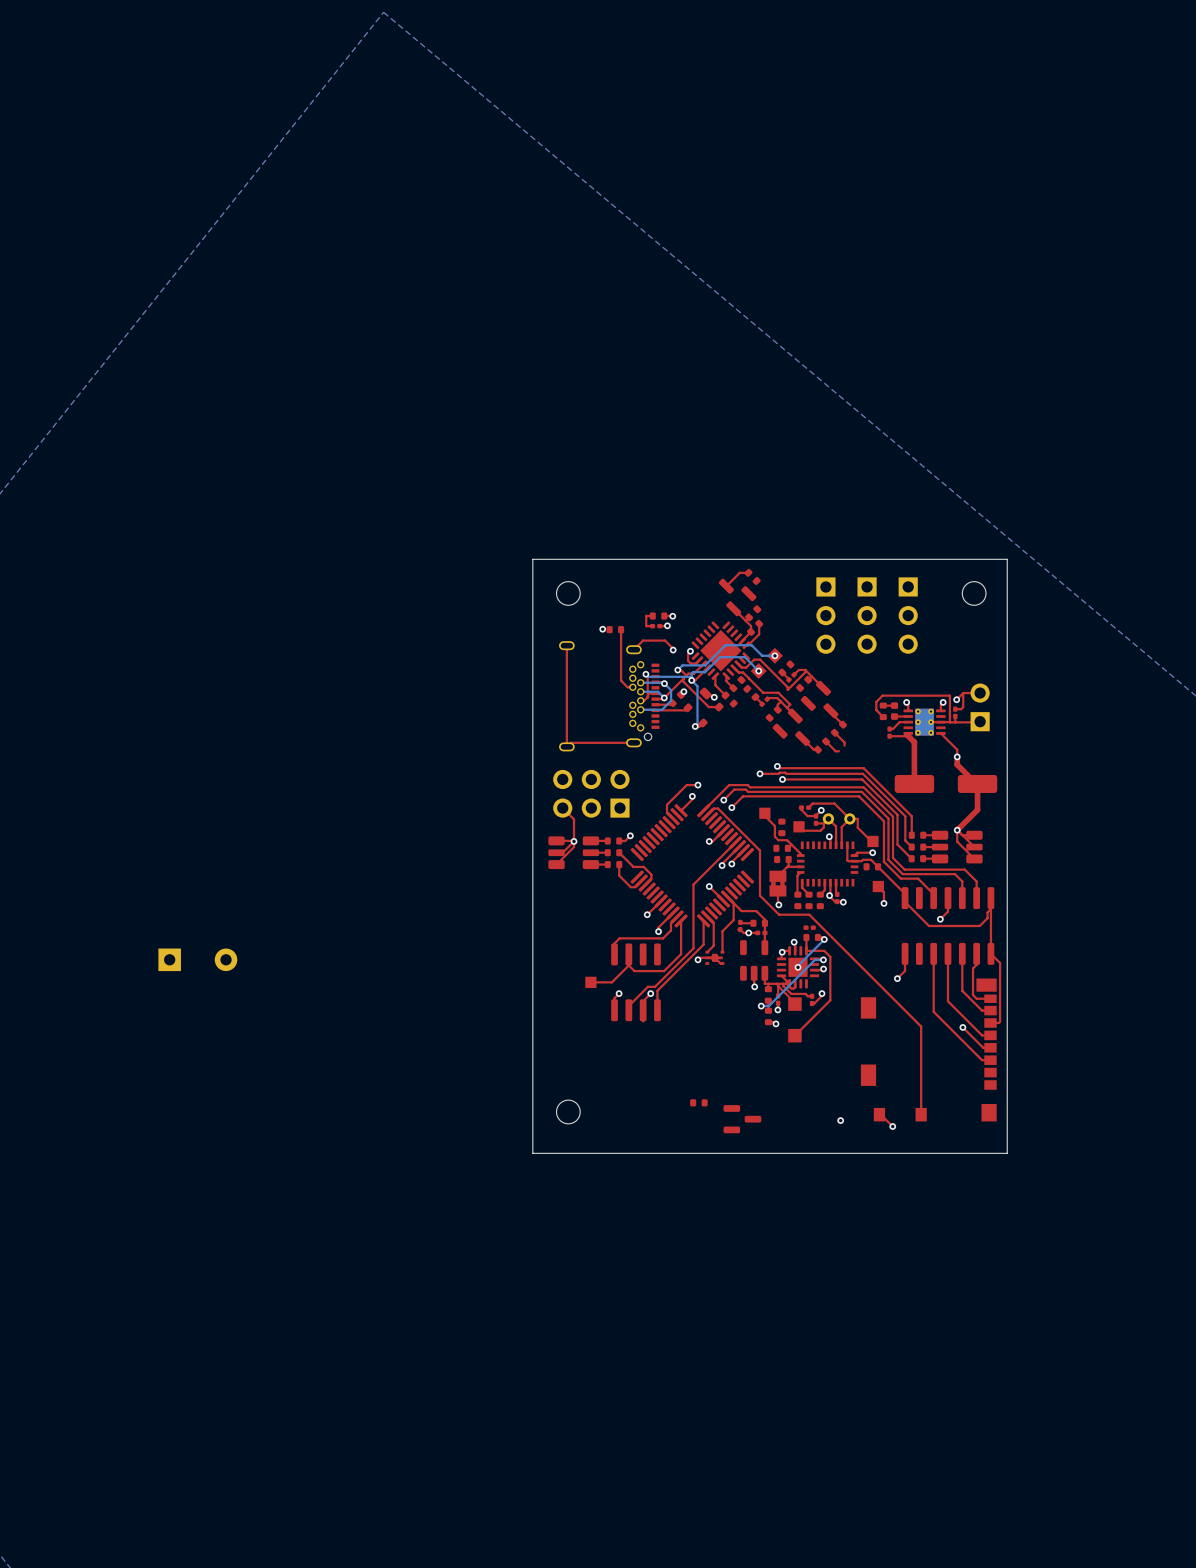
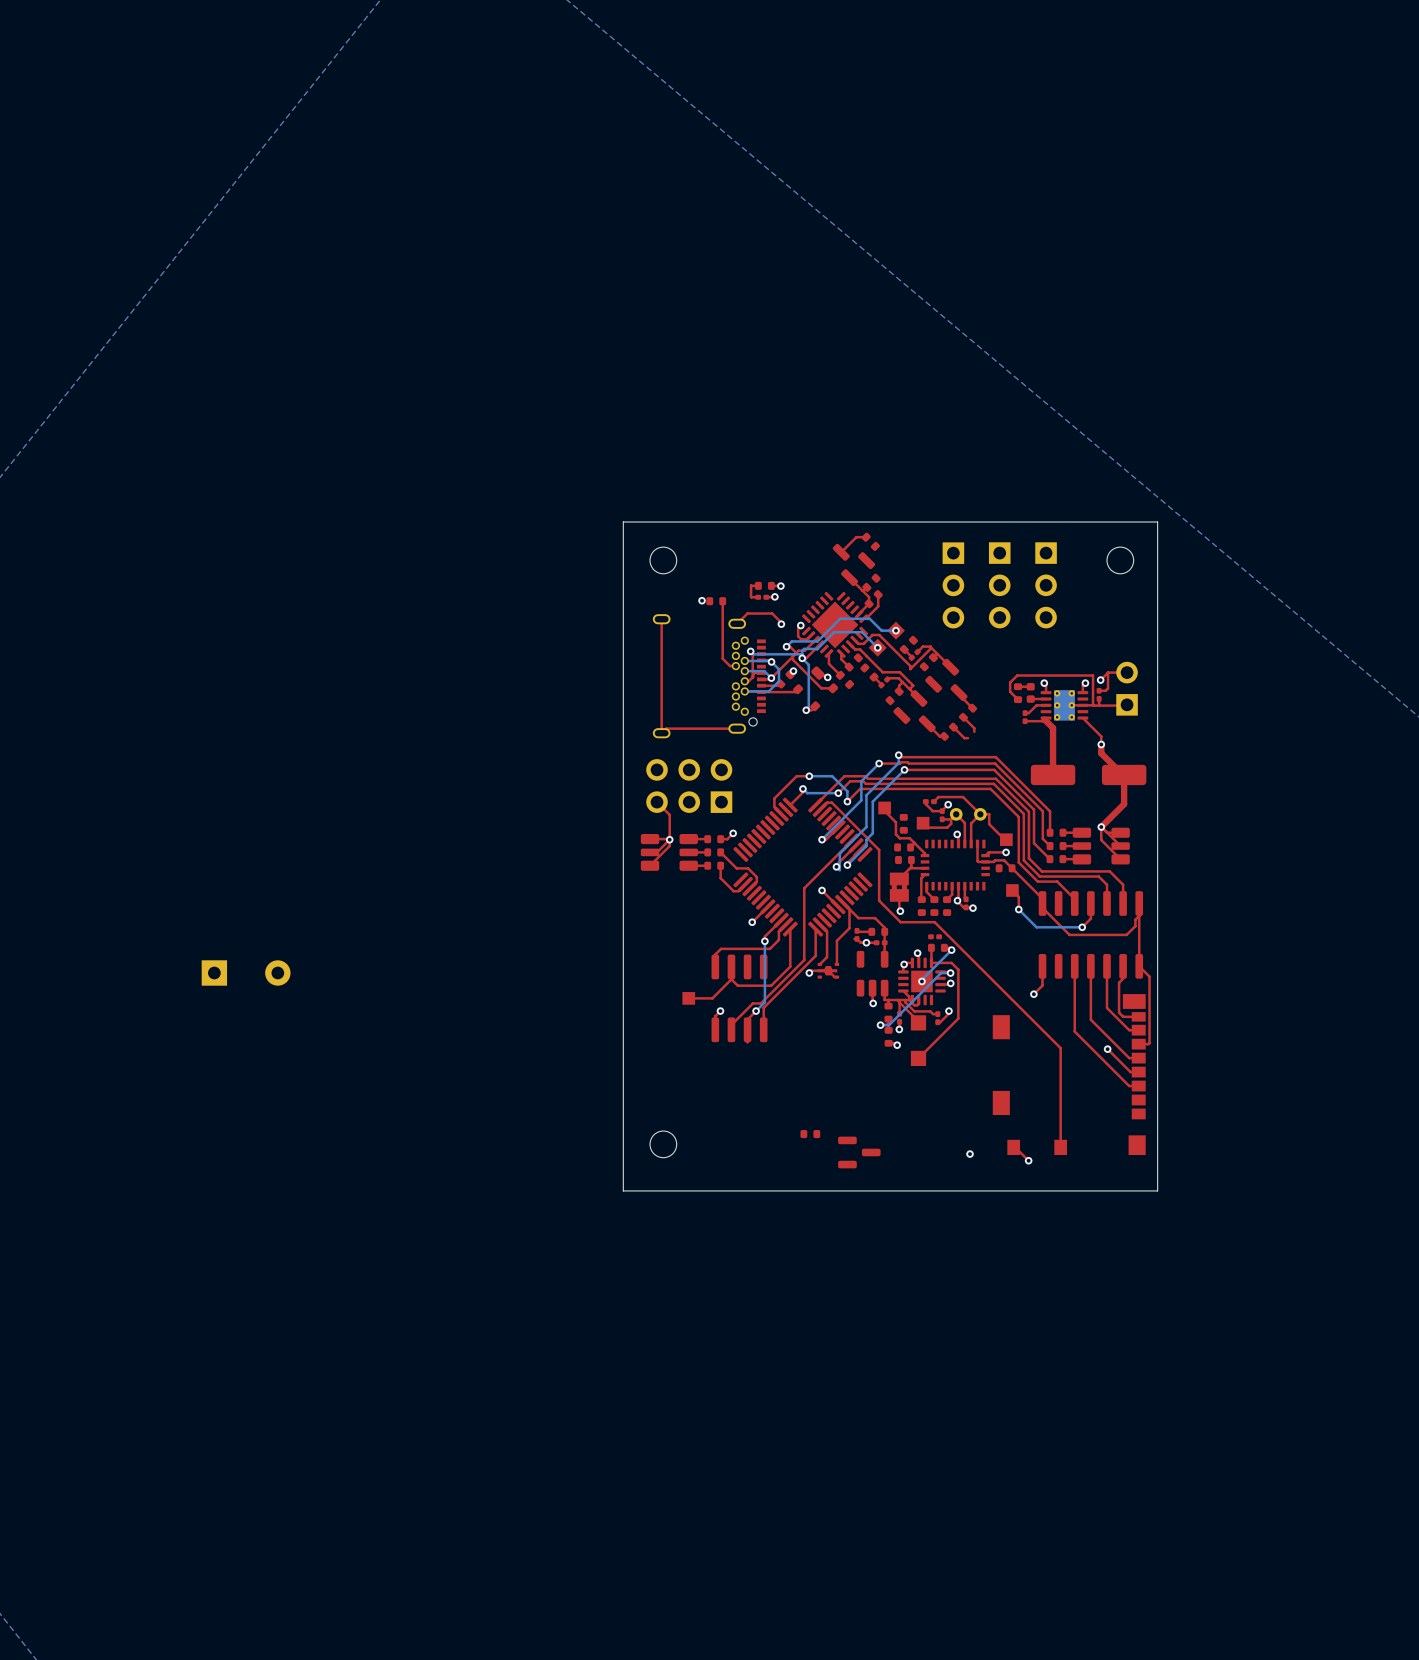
bottom track: none -> (898, 755) (898, 763) (866, 795) (866, 827) (839, 853) (839, 870) (836, 866)
bottom track: none -> (879, 763) (861, 781) (861, 800) (822, 839)
bottom track: none -> (904, 769) (872, 801) (872, 833) (866, 839) (866, 846) (847, 865)
bottom track: none -> (809, 776) (832, 776) (847, 791) (847, 801)
bottom track: none -> (802, 788) (807, 793) (838, 793)
bottom track: none -> (1018, 909) (1036, 927) (1082, 927)
bottom track: none -> (764, 941) (764, 1002) (756, 1011)

